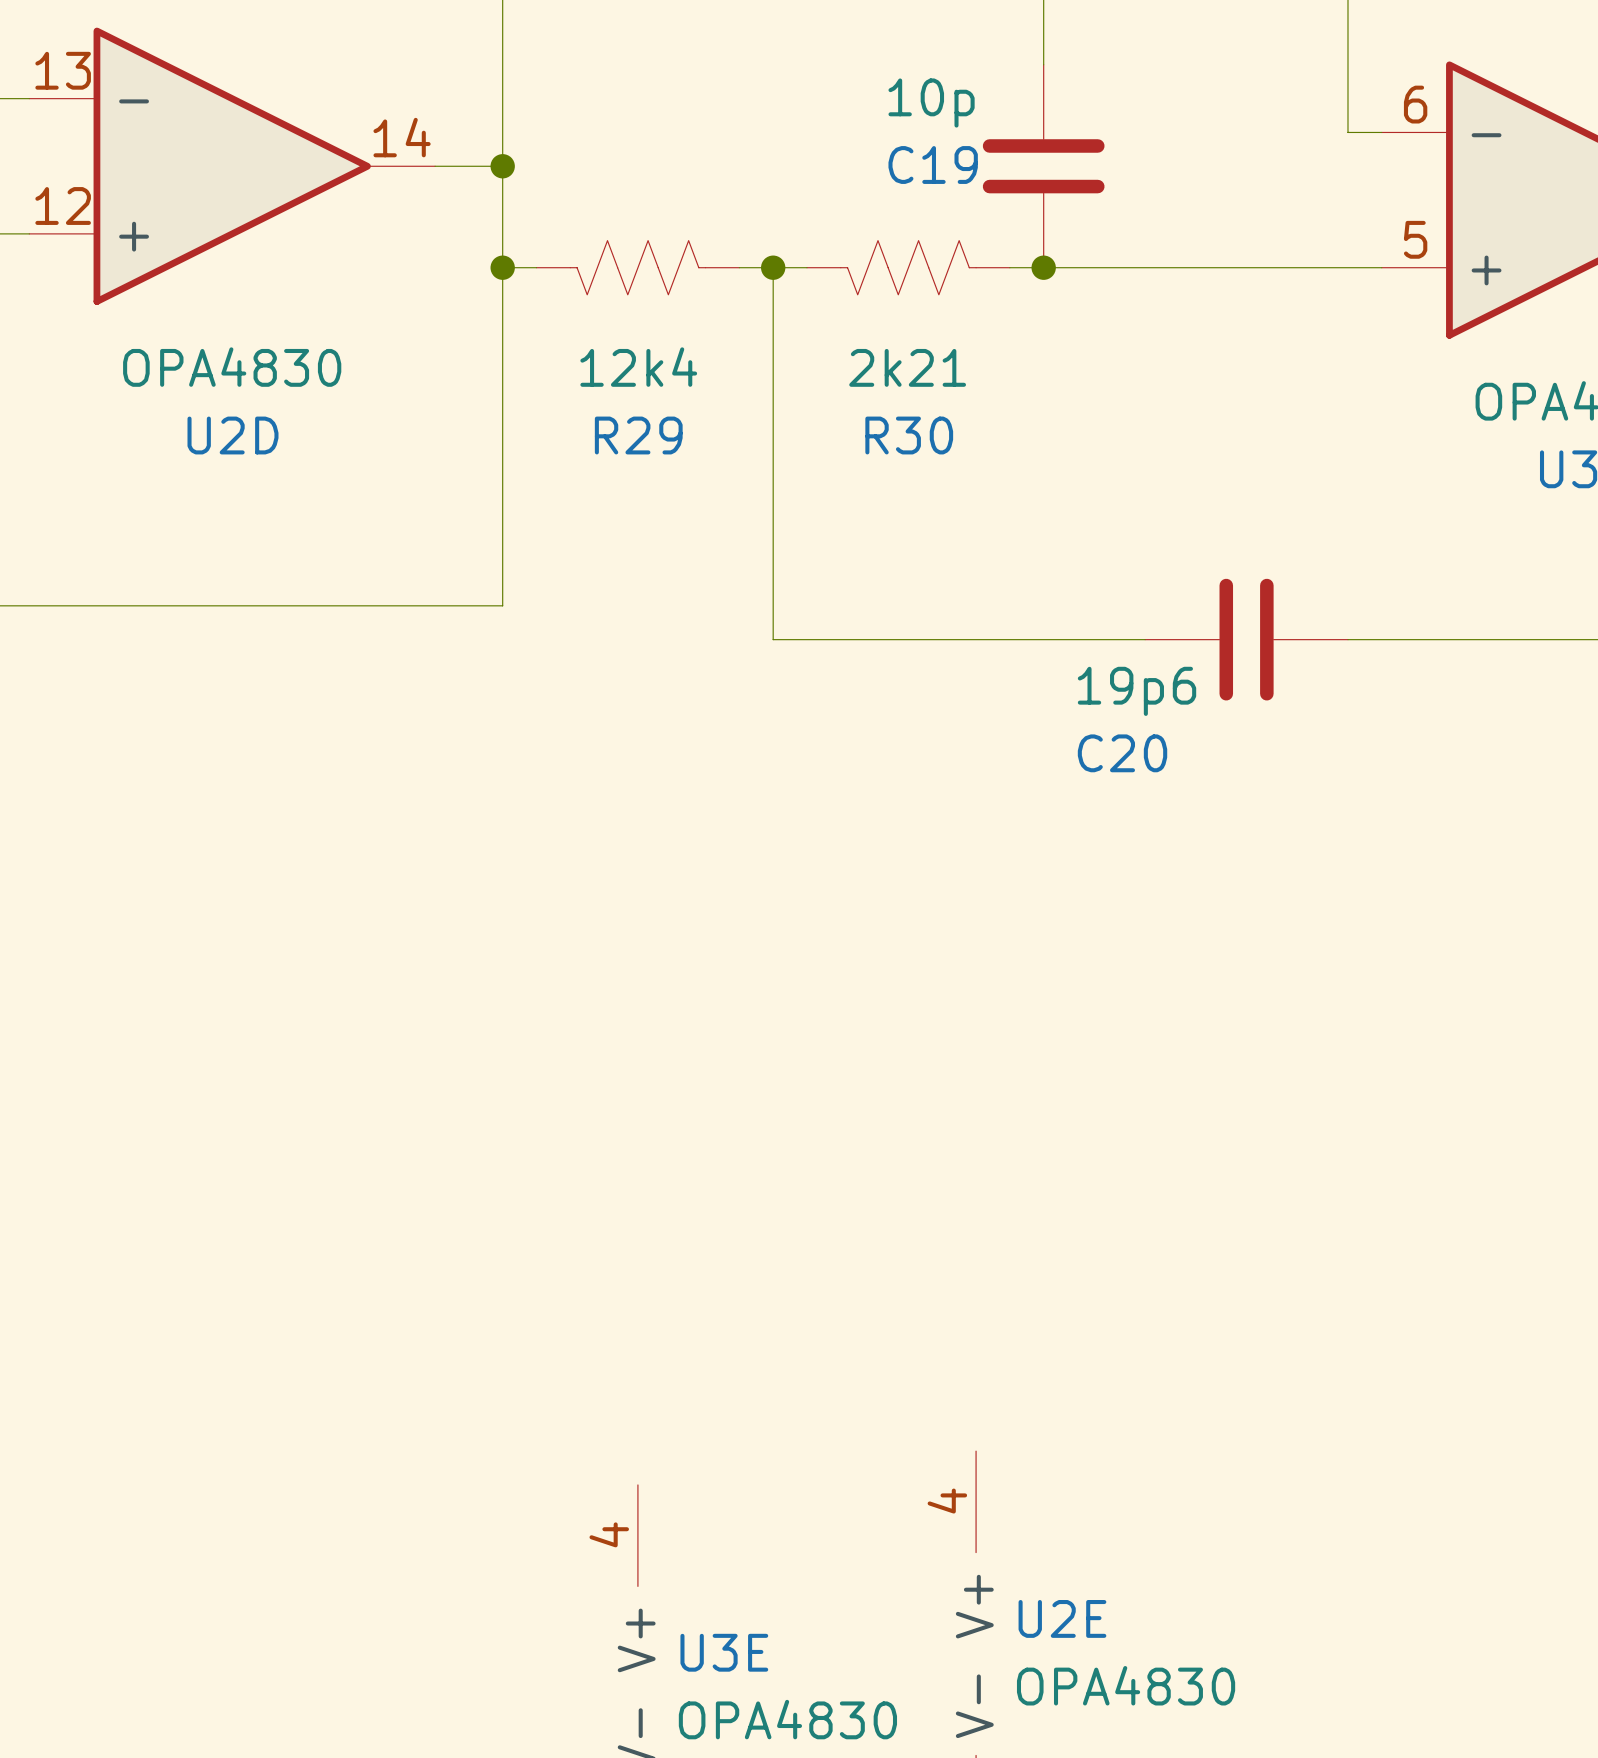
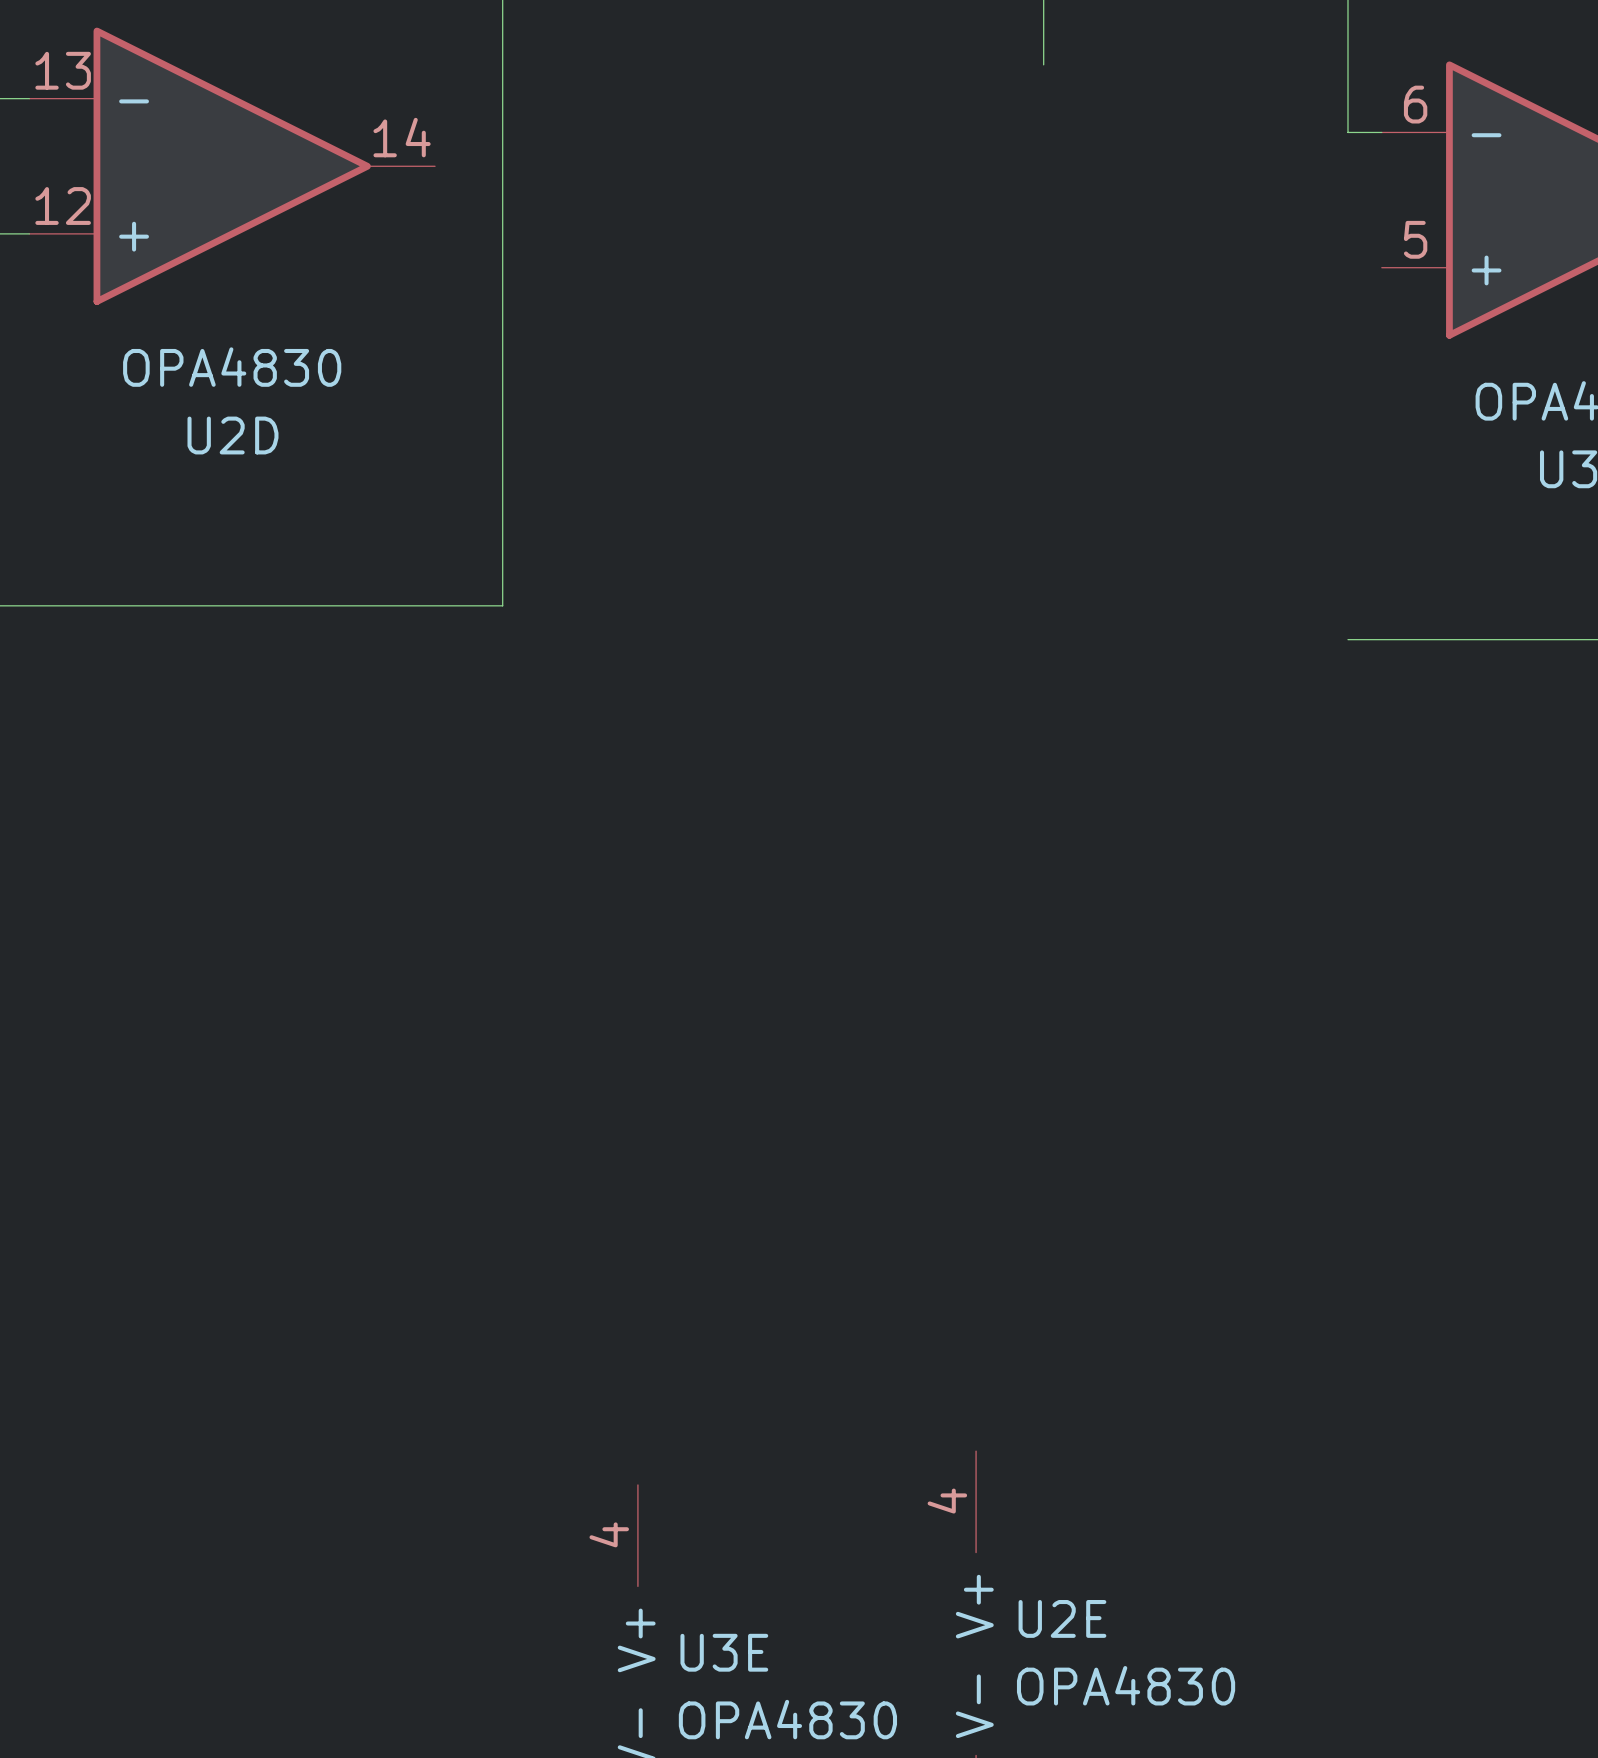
wire: (435, 166) (502, 166) -> none
junction: (502, 166) -> none
C19: 10p (1043, 166) -> none
wire: (502, 267) (536, 267) -> none
junction: (502, 267) -> none
R29: 12k4 (637, 267) -> none
wire: (739, 267) (806, 267) -> none
wire: (773, 267) (773, 639) (1145, 639) -> none
junction: (773, 267) -> none
R30: 2k21 (908, 267) -> none
wire: (1009, 267) (1381, 267) -> none
junction: (1043, 267) -> none
C20: 19p6 (1246, 639) -> none

